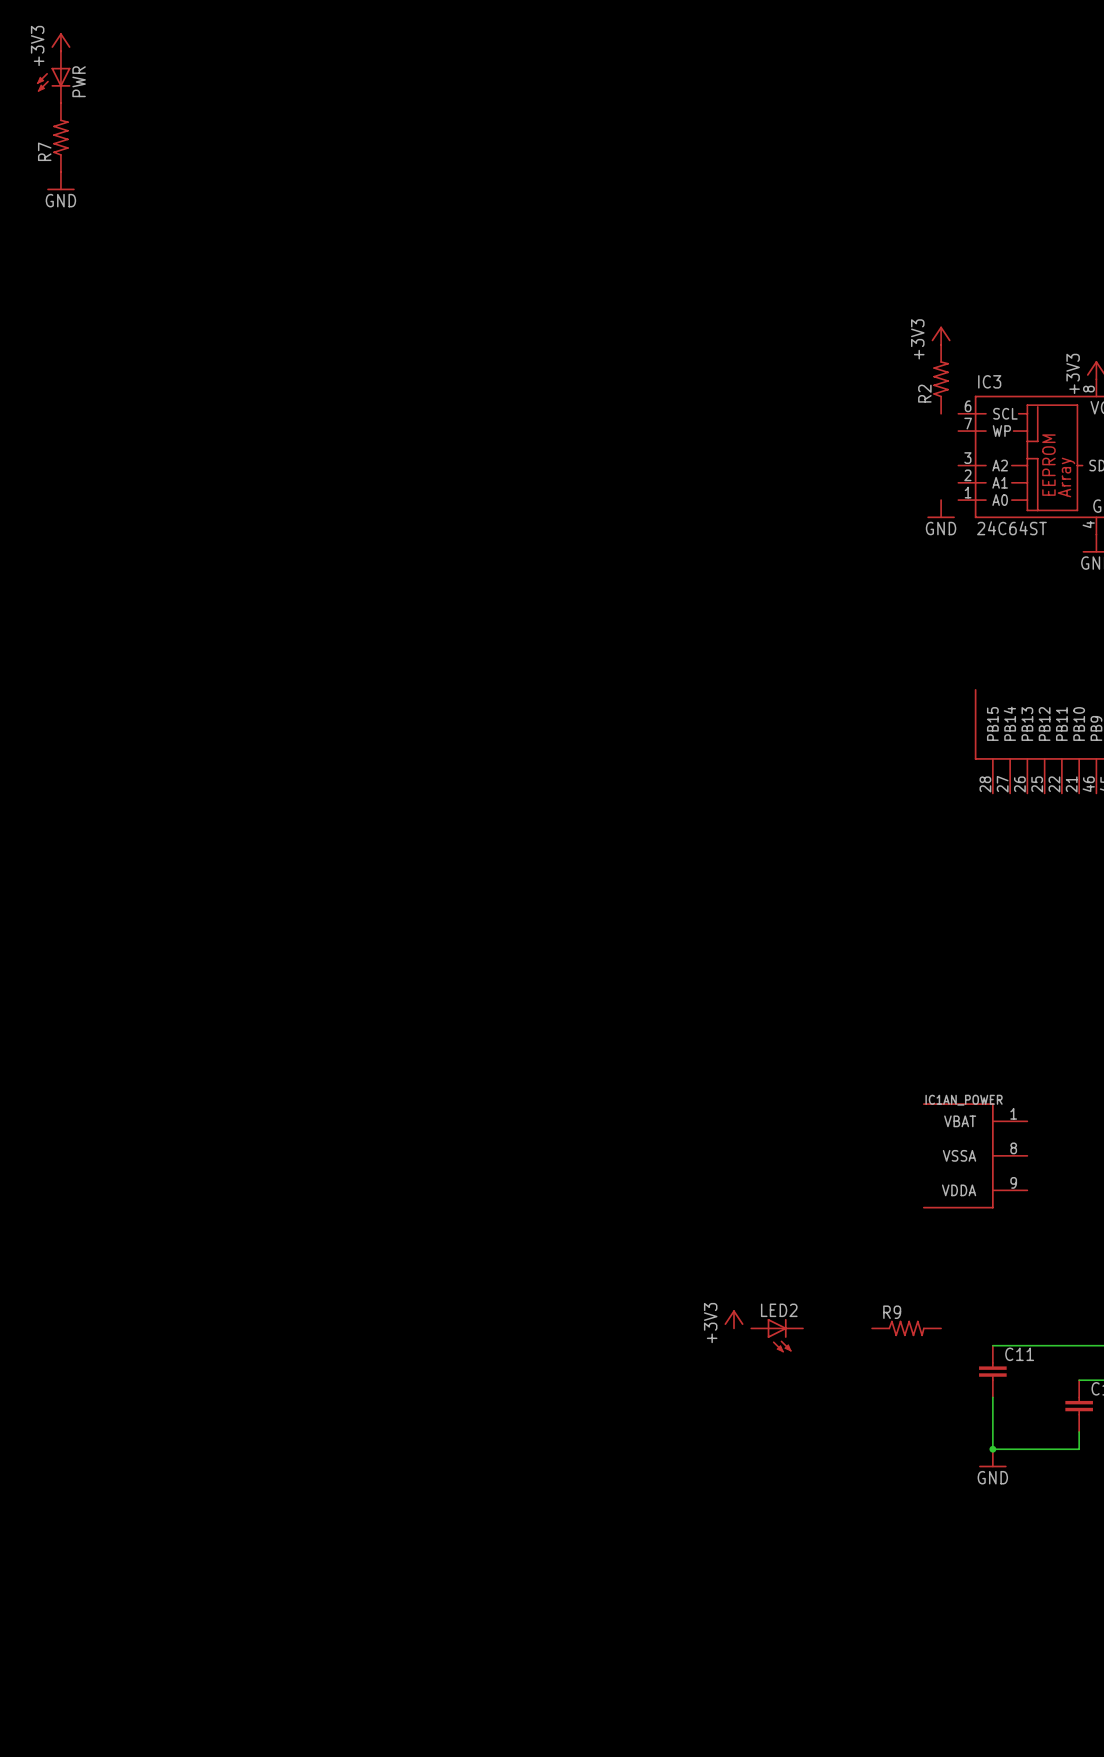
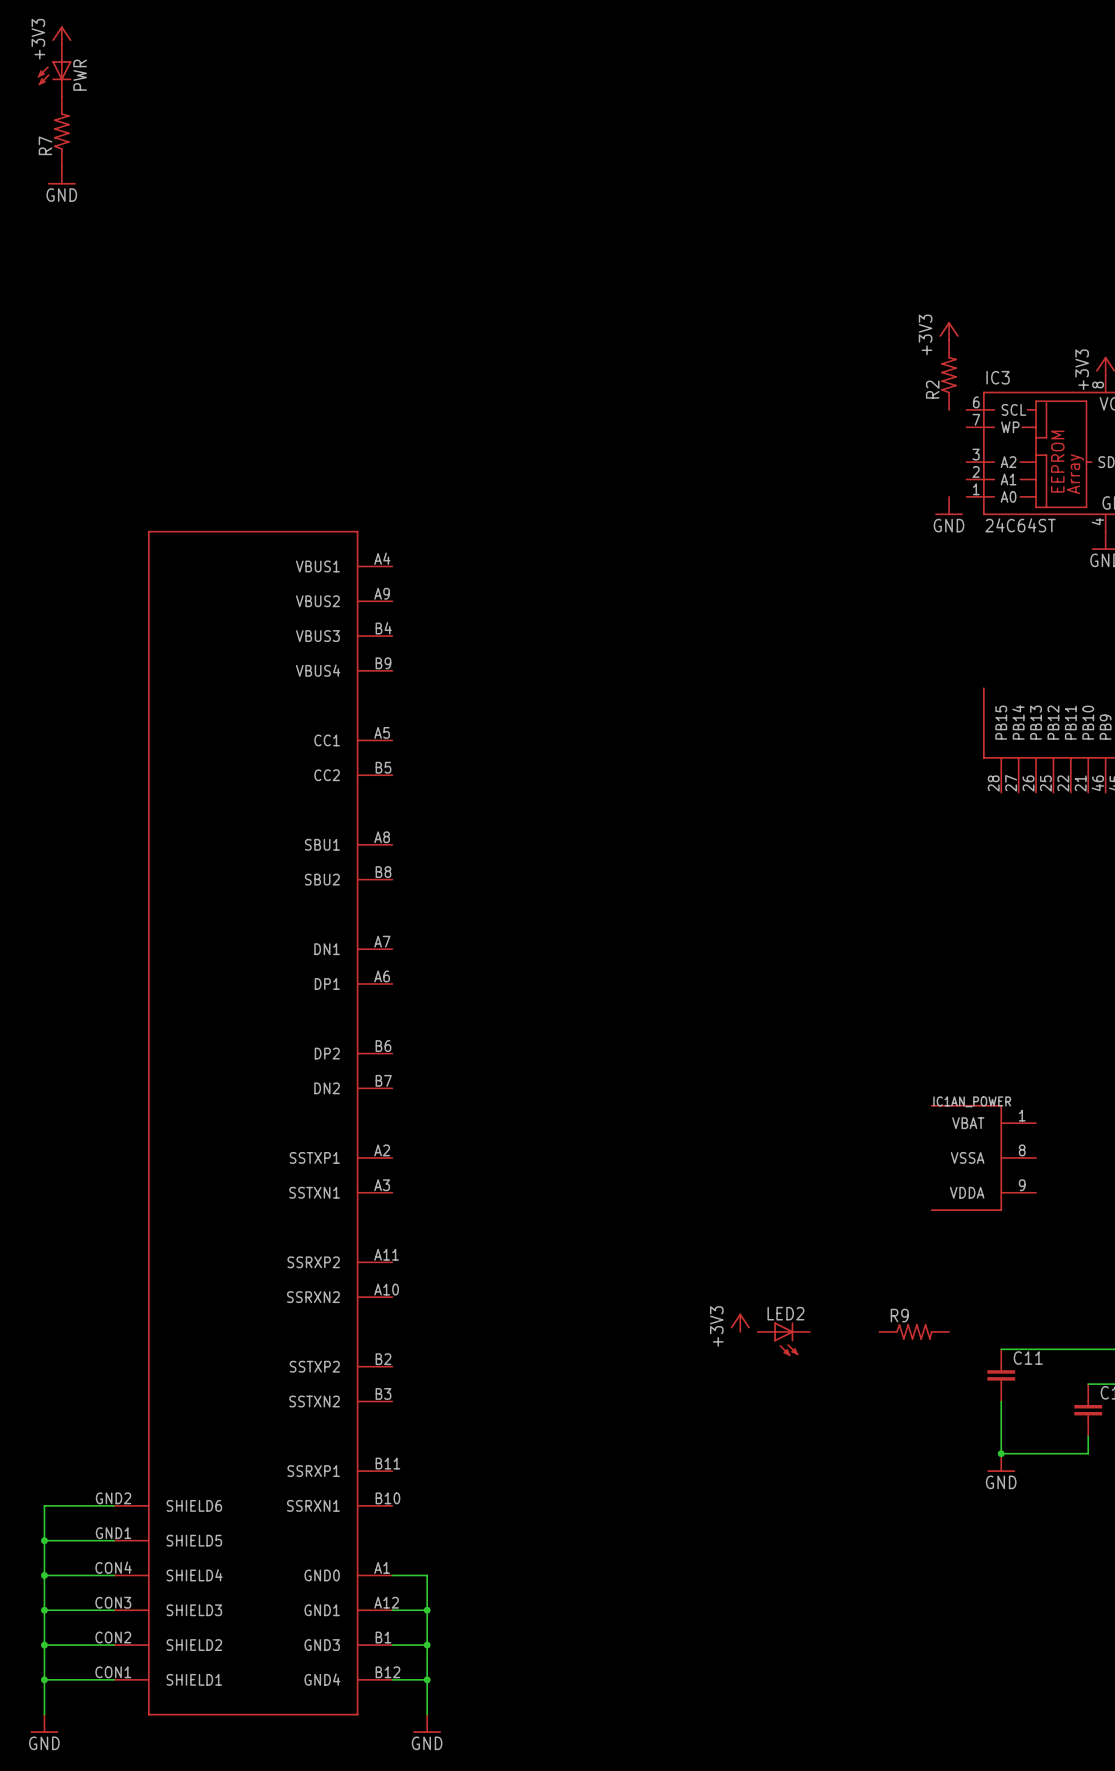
part: none -> (253, 1123)
wire: none -> (114, 1505) (44, 1505) (44, 1714)
wire: none -> (44, 1540) (114, 1540)
junction: none -> (44, 1540)
wire: none -> (44, 1575) (114, 1575)
junction: none -> (44, 1575)
wire: none -> (392, 1575) (427, 1575) (427, 1714)
wire: none -> (44, 1610) (114, 1610)
junction: none -> (44, 1610)
wire: none -> (392, 1610) (427, 1610)
junction: none -> (427, 1610)
wire: none -> (44, 1645) (114, 1645)
junction: none -> (44, 1645)
wire: none -> (392, 1645) (427, 1645)
junction: none -> (427, 1645)
wire: none -> (44, 1679) (114, 1679)
junction: none -> (44, 1679)
wire: none -> (392, 1679) (427, 1679)
junction: none -> (427, 1679)
power symbol: none -> GND (44, 1723)
power symbol: none -> GND (427, 1723)

